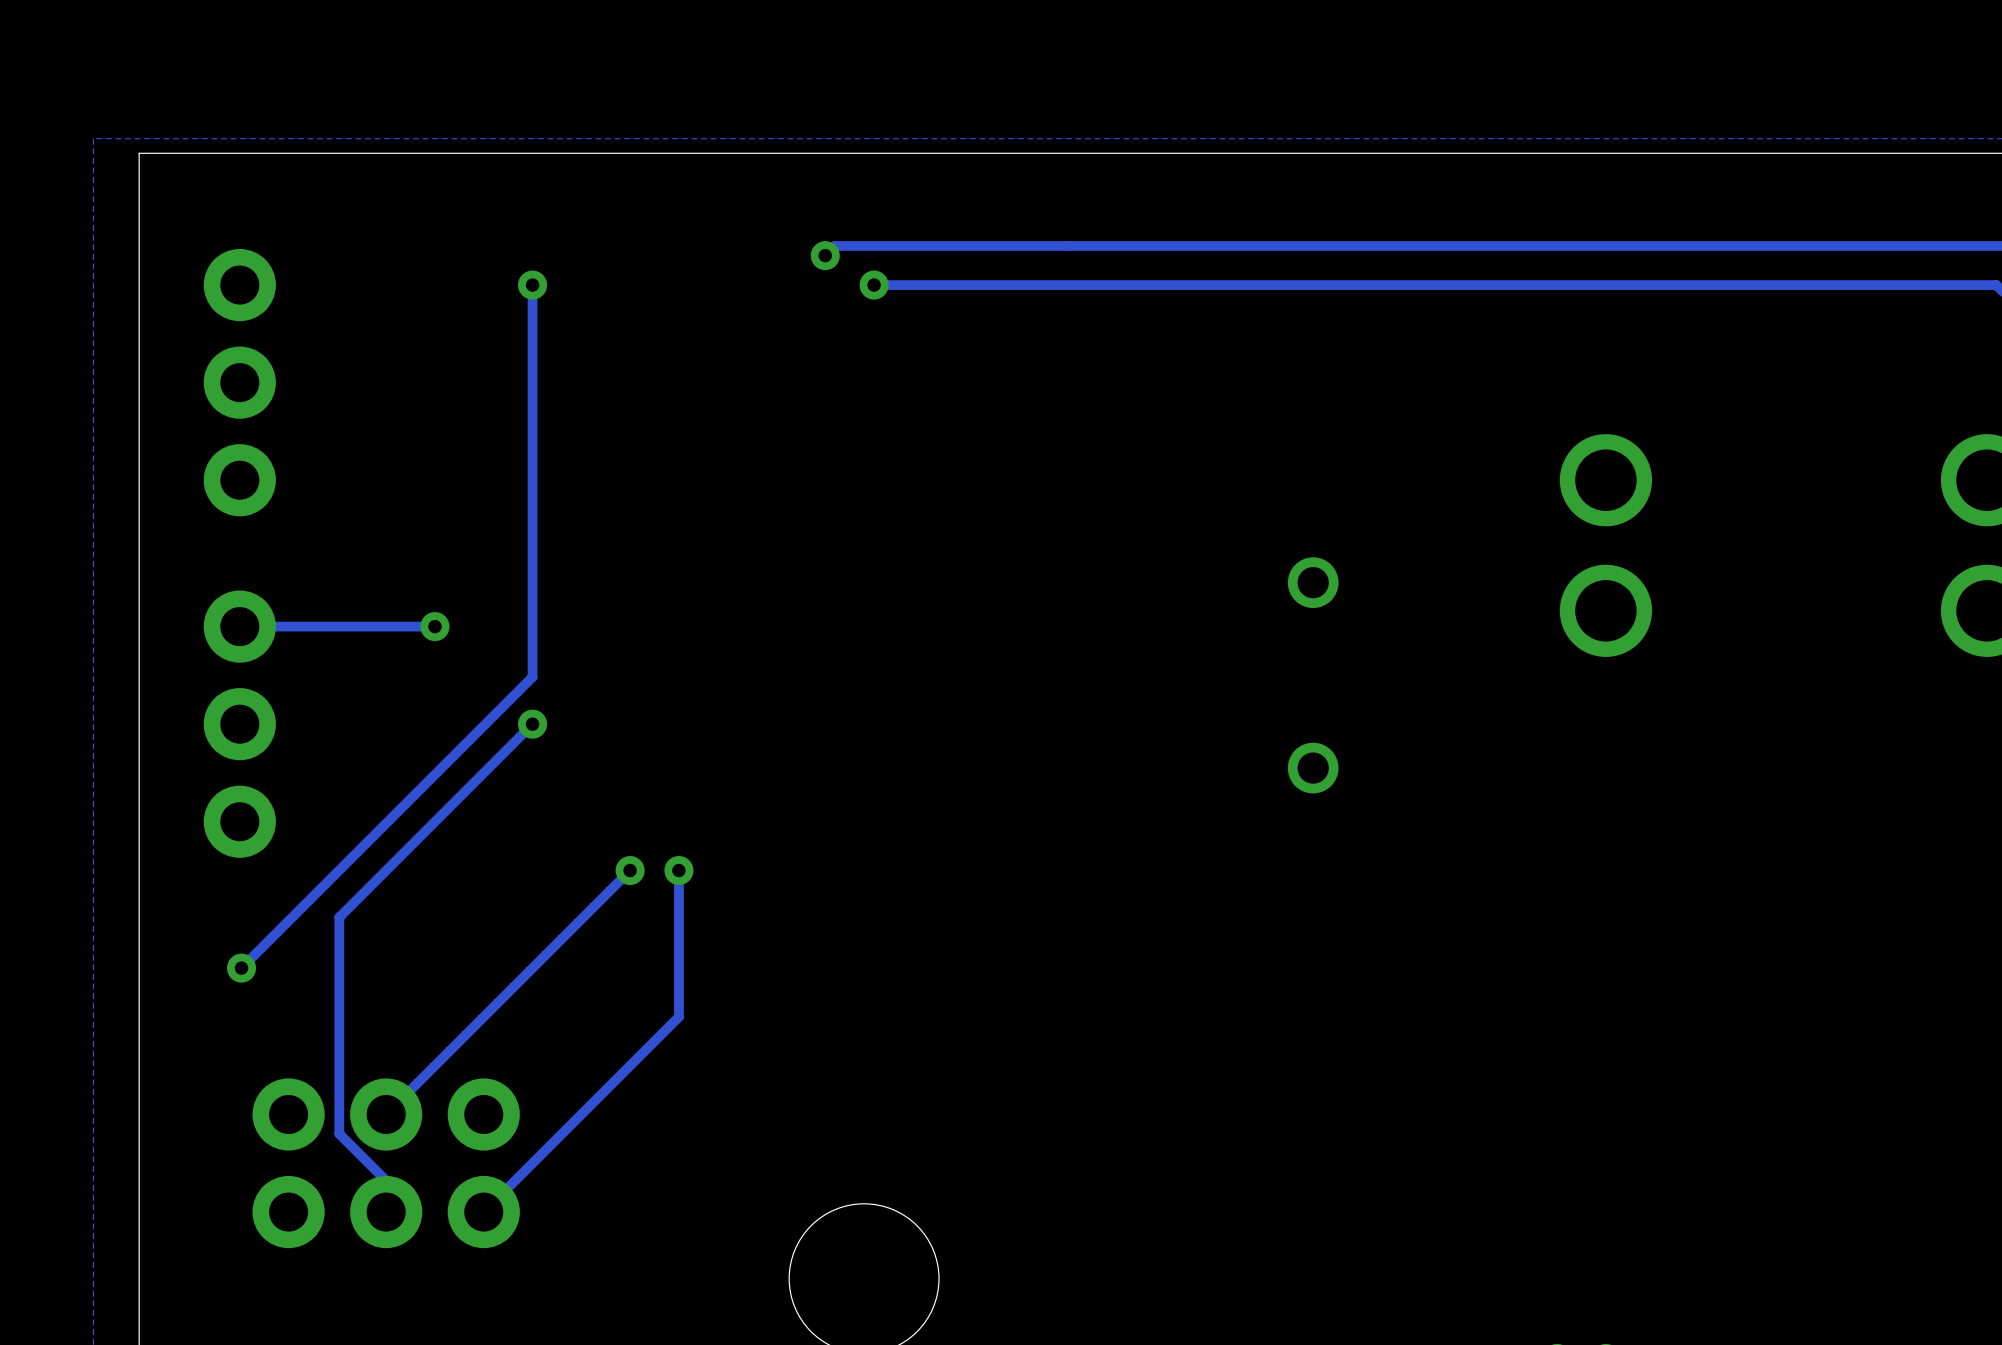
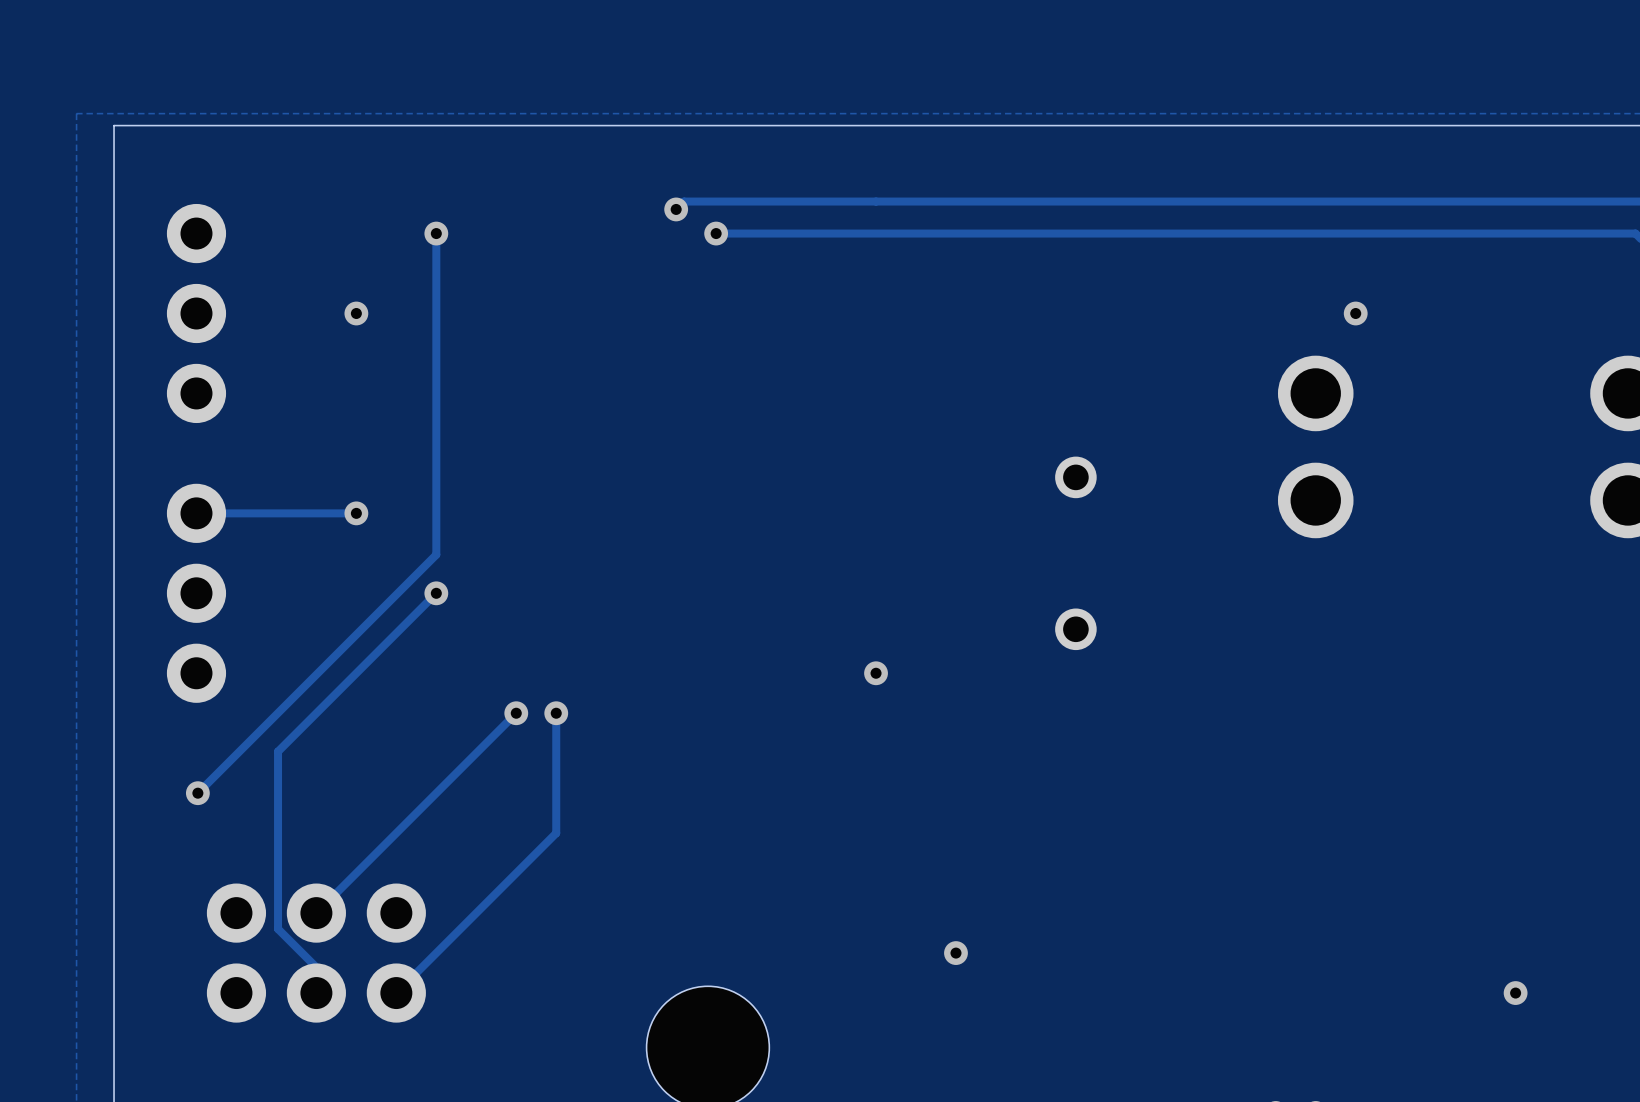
via: none -> (356, 313)
via: none -> (1355, 313)
via: none -> (876, 673)
via: none -> (955, 953)
via: none -> (1515, 993)

